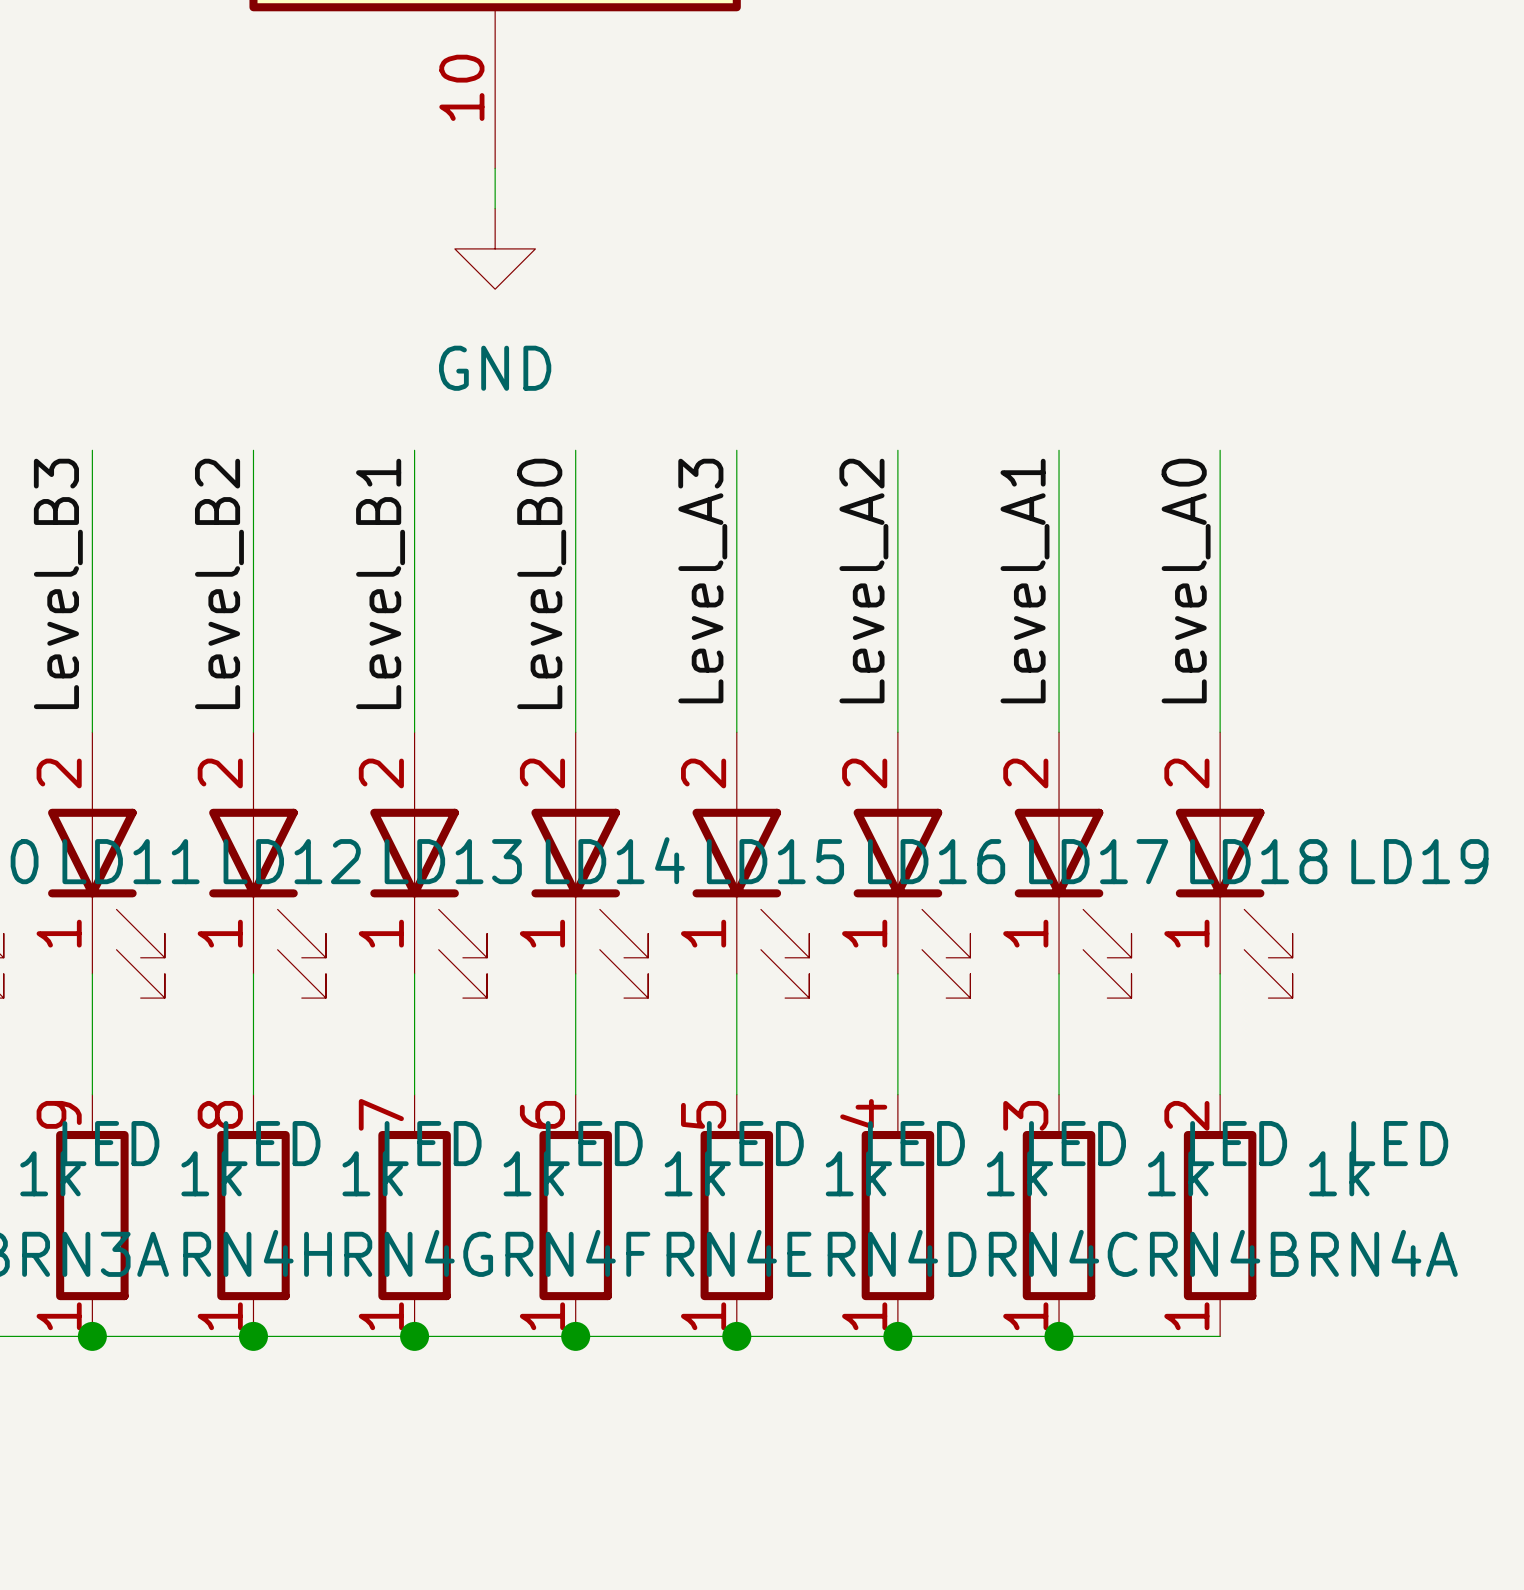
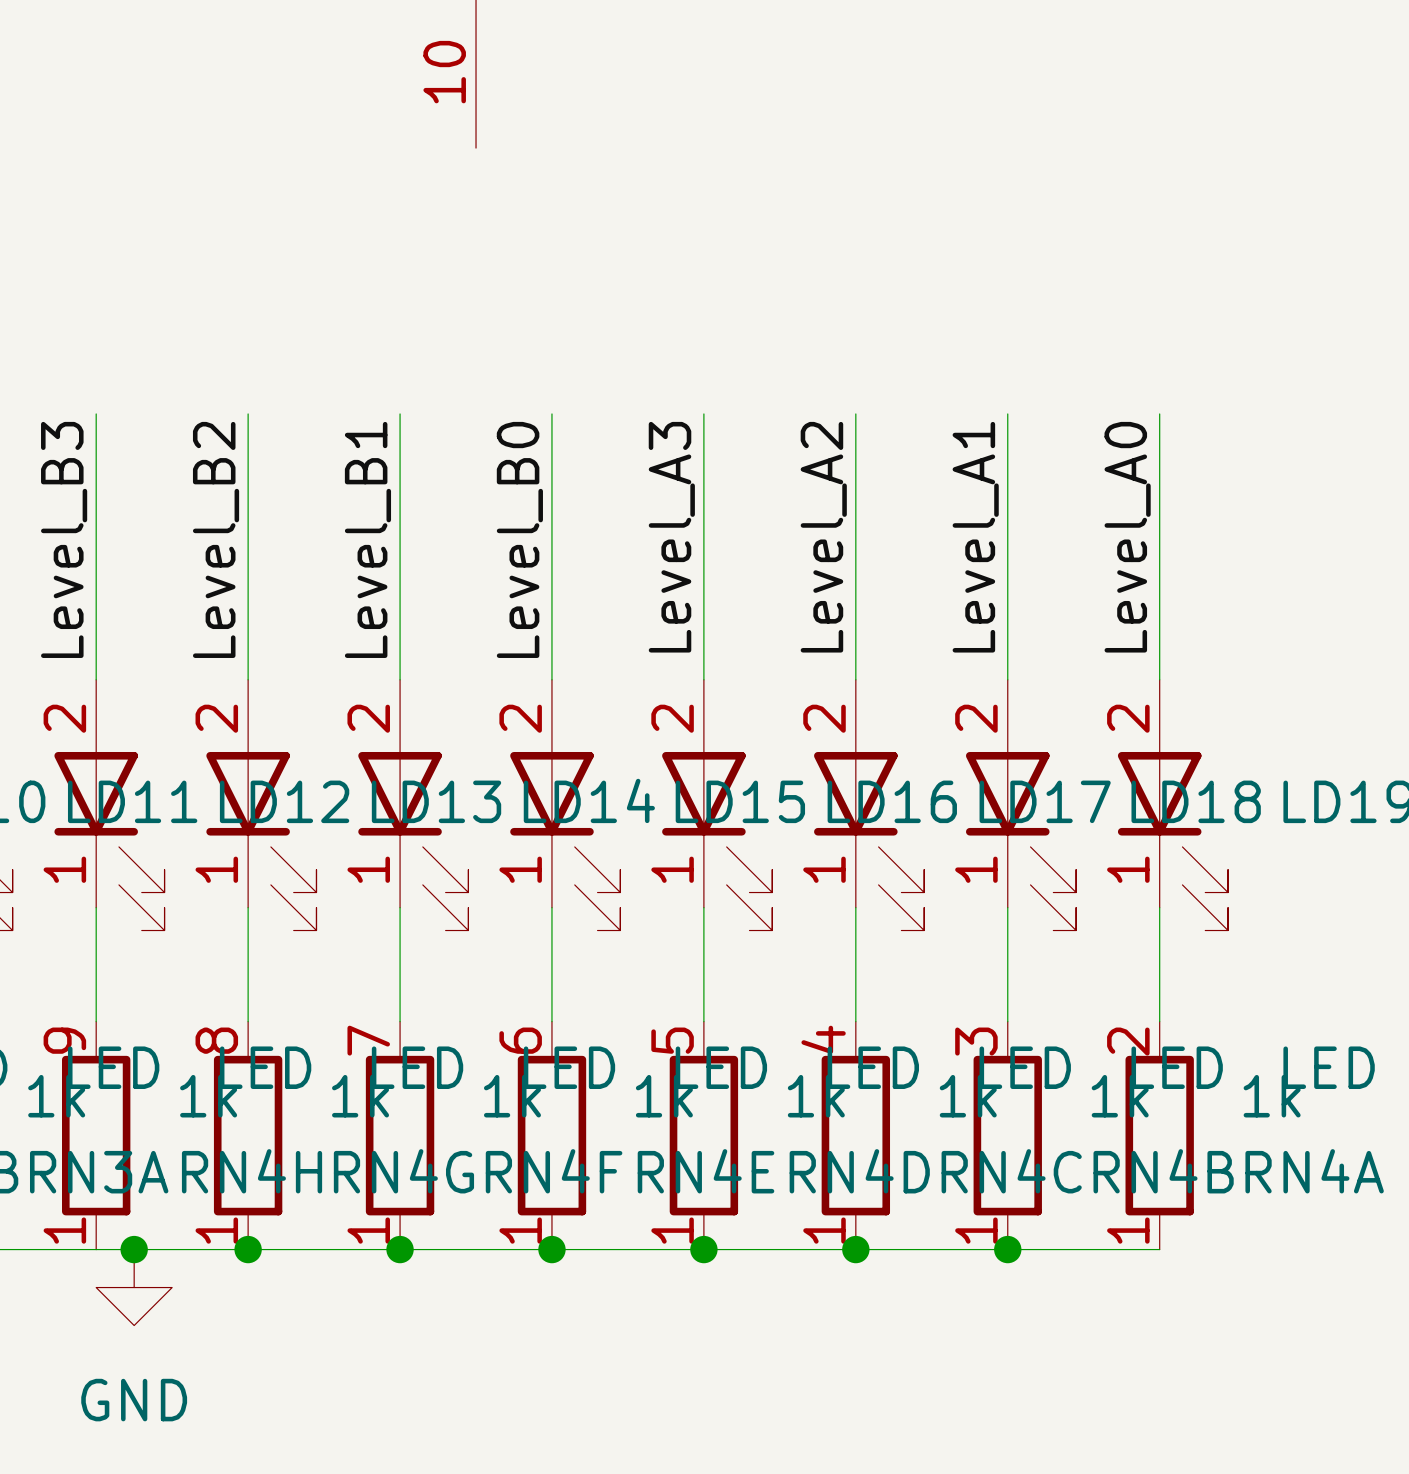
wire: (495, 168) (495, 208) -> none
power symbol: GND (495, 248) -> none
junction position: (92, 1336) -> (134, 1249)
power symbol: none -> GND (134, 1287)

